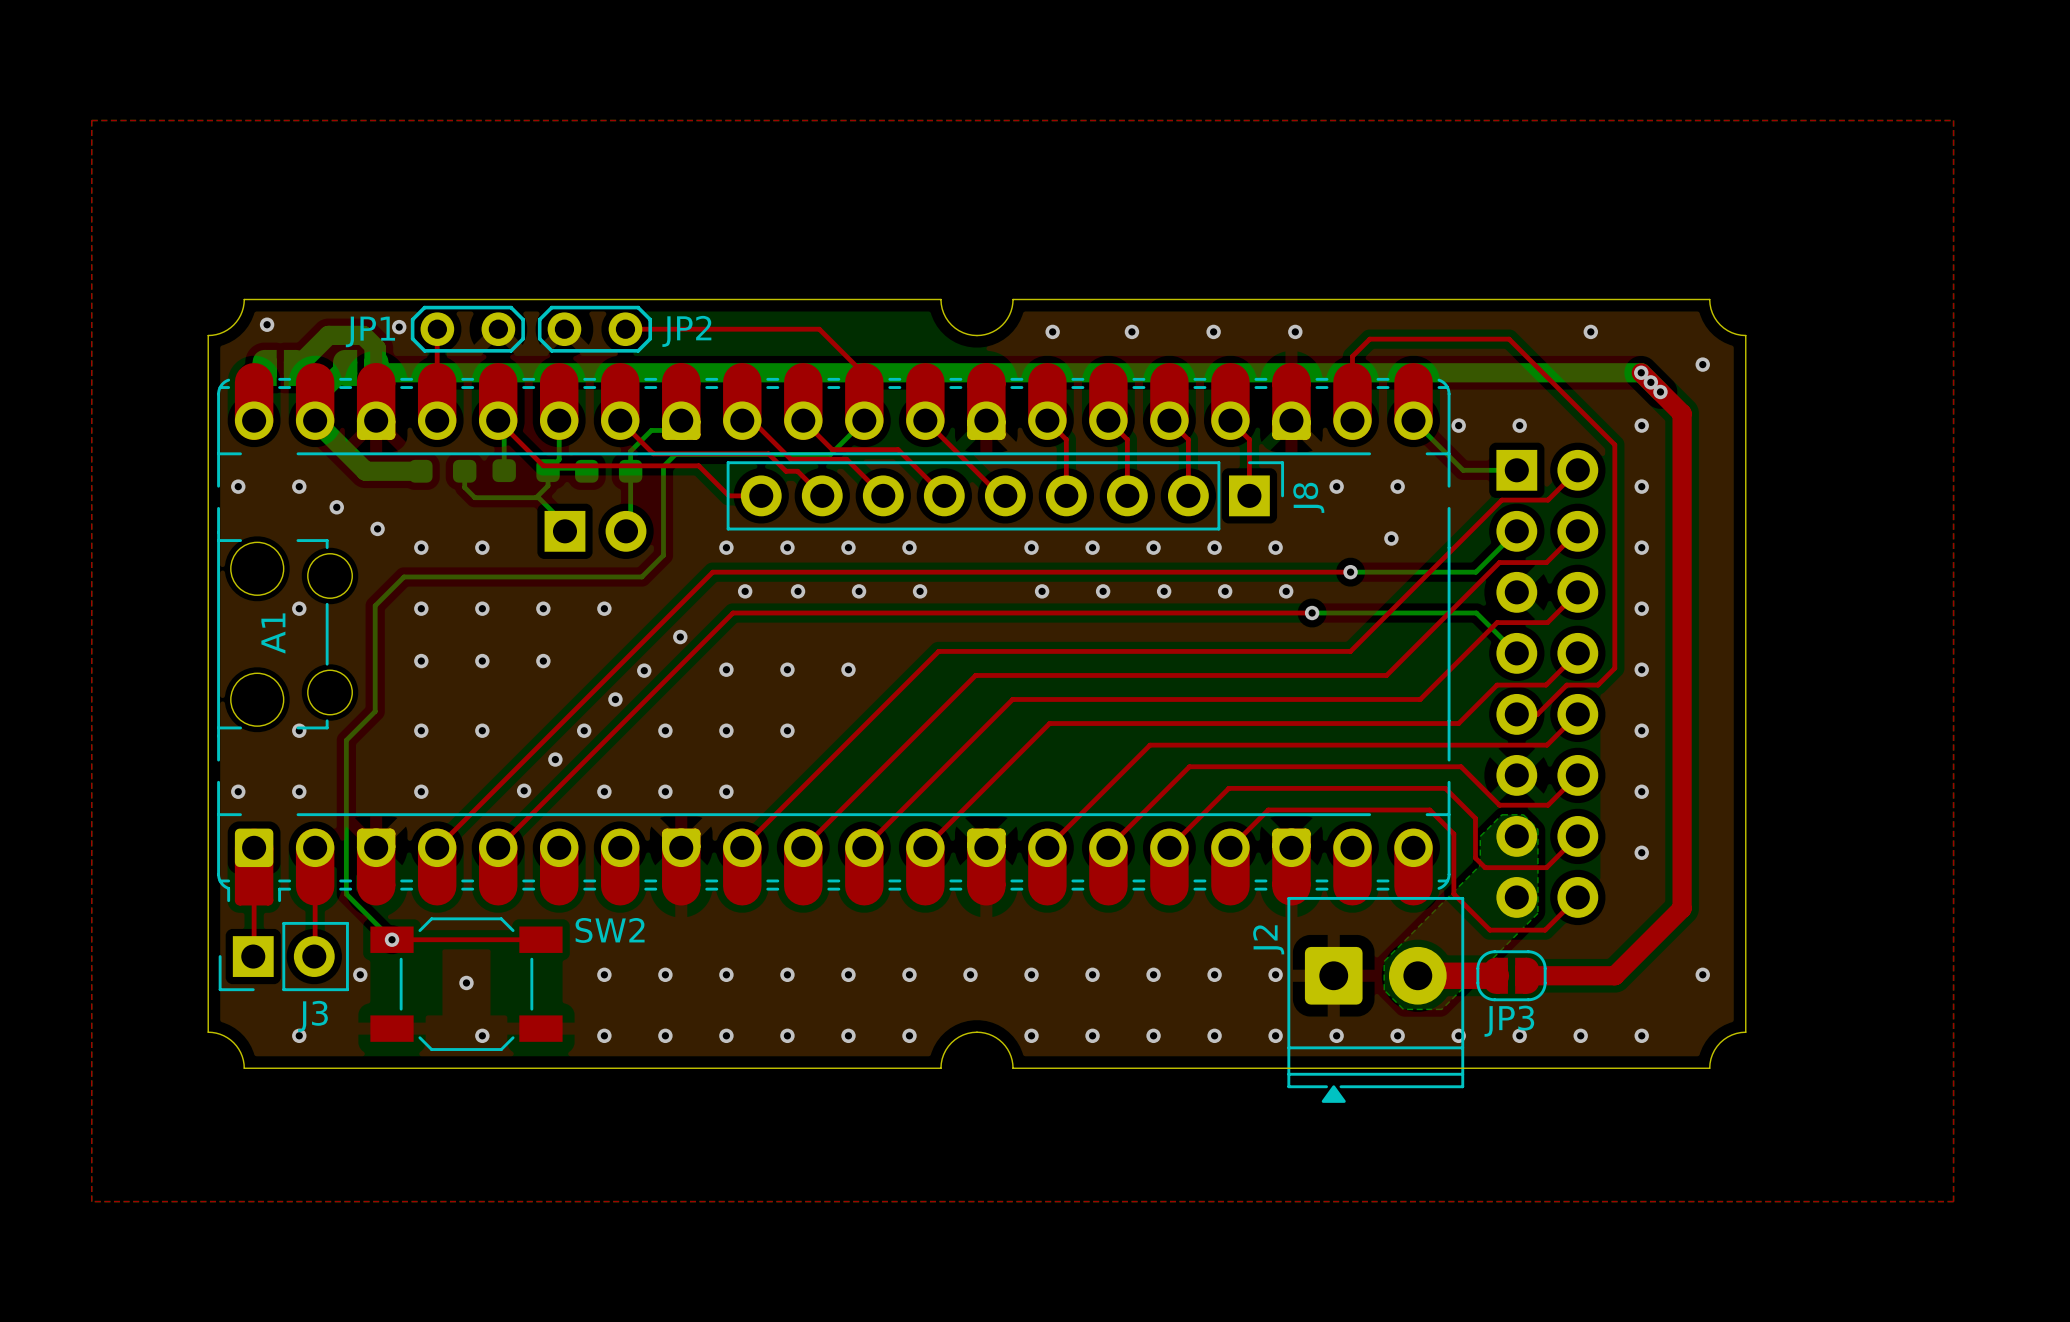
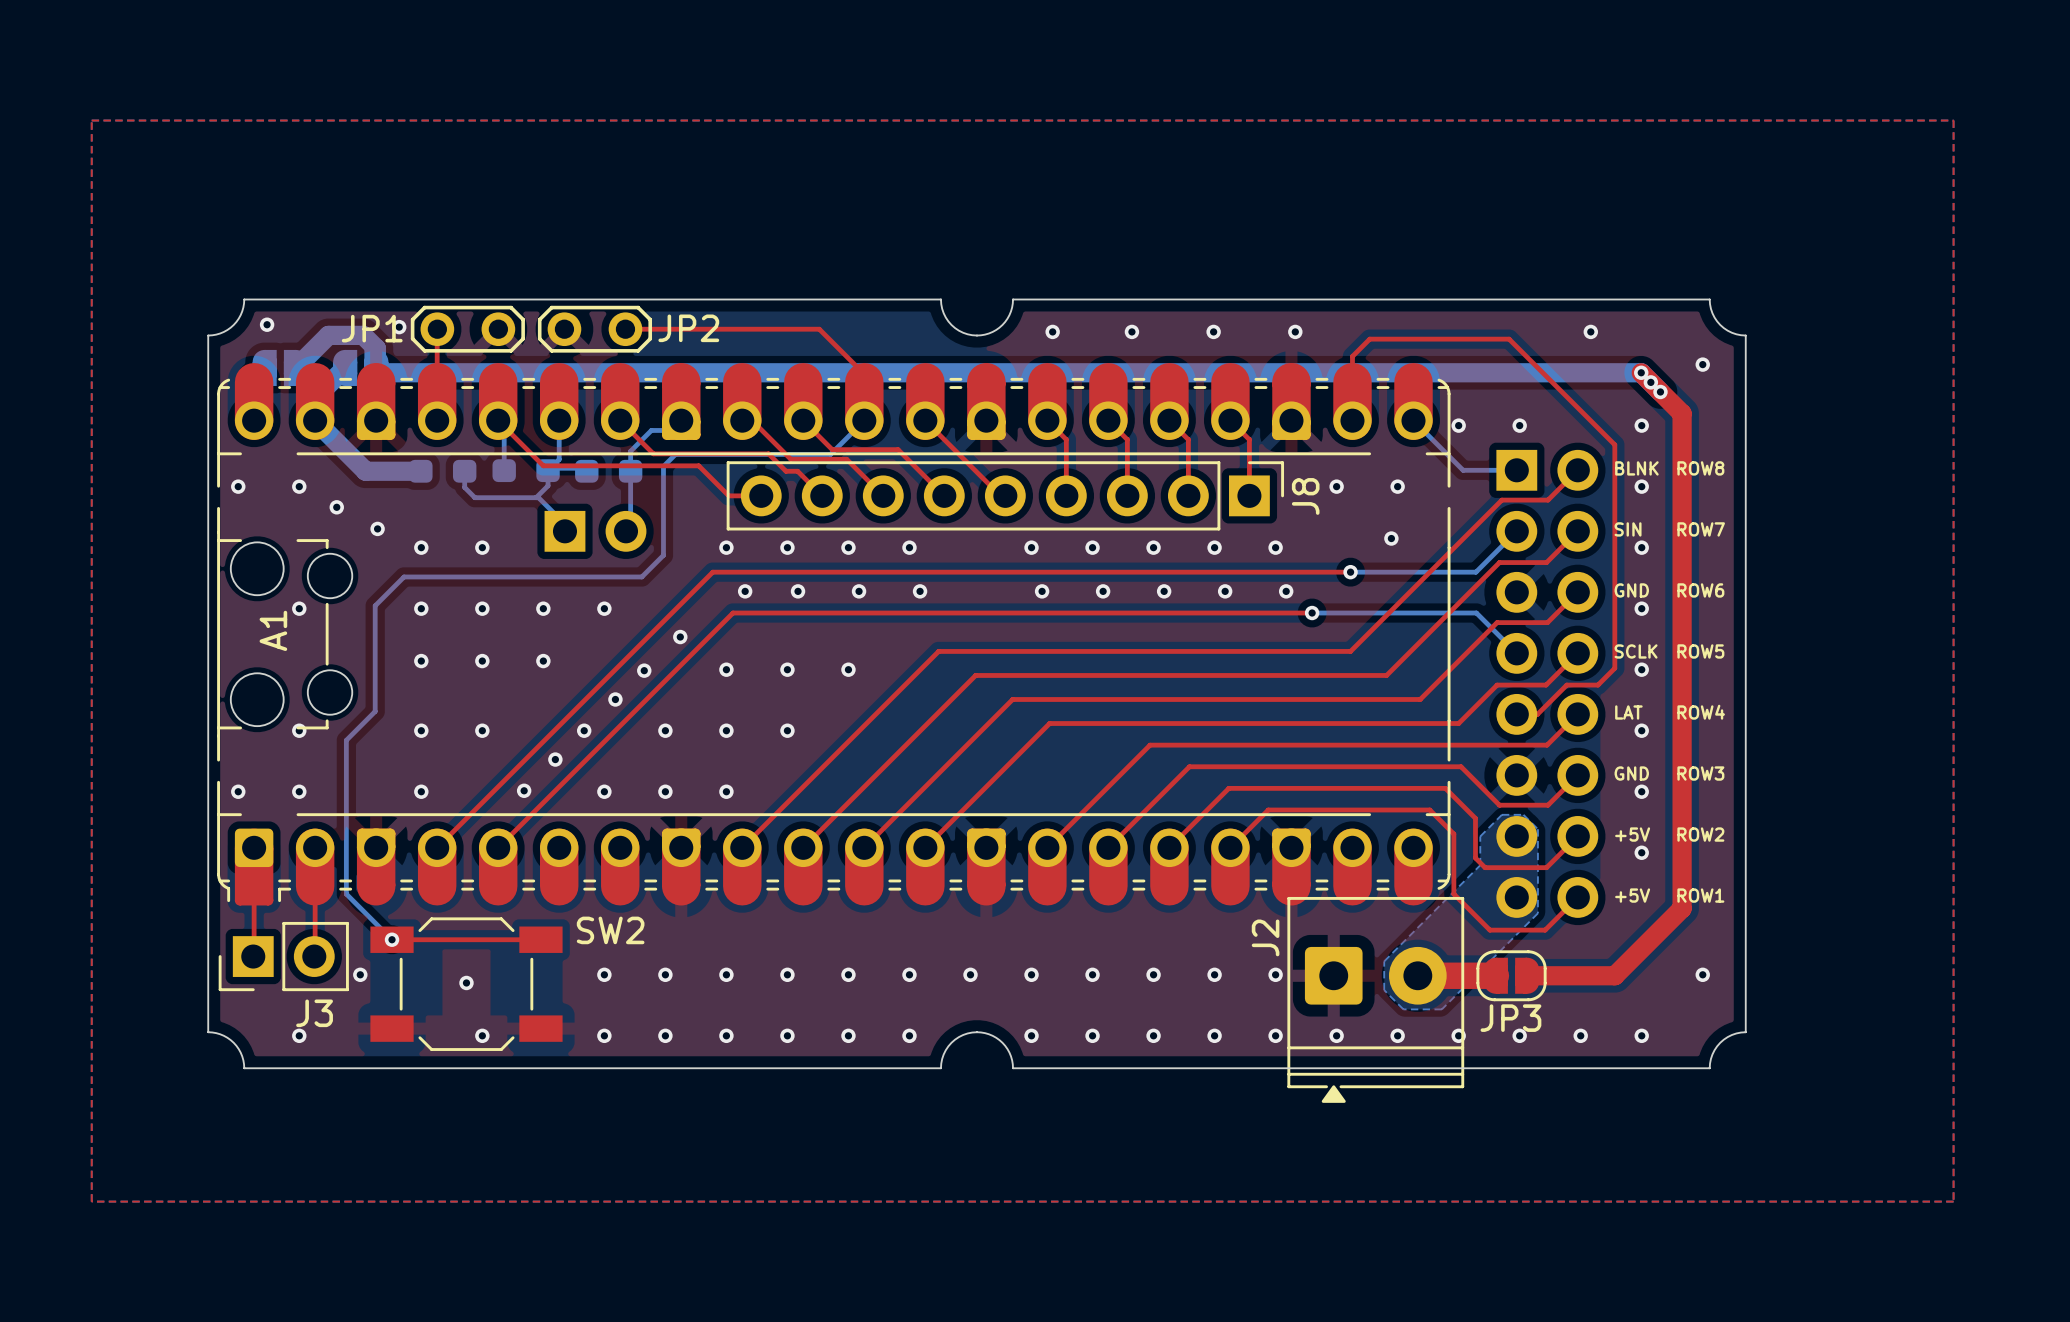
text: none -> BLNK (1636, 468)
text: none -> ROW8 (1700, 468)
text: none -> SIN (1628, 529)
text: none -> ROW7 (1701, 529)
text: none -> GND (1631, 590)
text: none -> ROW6 (1700, 590)
text: none -> SCLK (1636, 651)
text: none -> ROW5 (1700, 651)
text: none -> LAT (1628, 712)
text: none -> ROW4 (1701, 712)
text: none -> GND (1631, 773)
text: none -> ROW3 (1700, 773)
text: none -> +5V (1632, 834)
text: none -> ROW2 (1700, 834)
text: none -> +5V (1632, 895)
text: none -> ROW1 (1700, 895)

